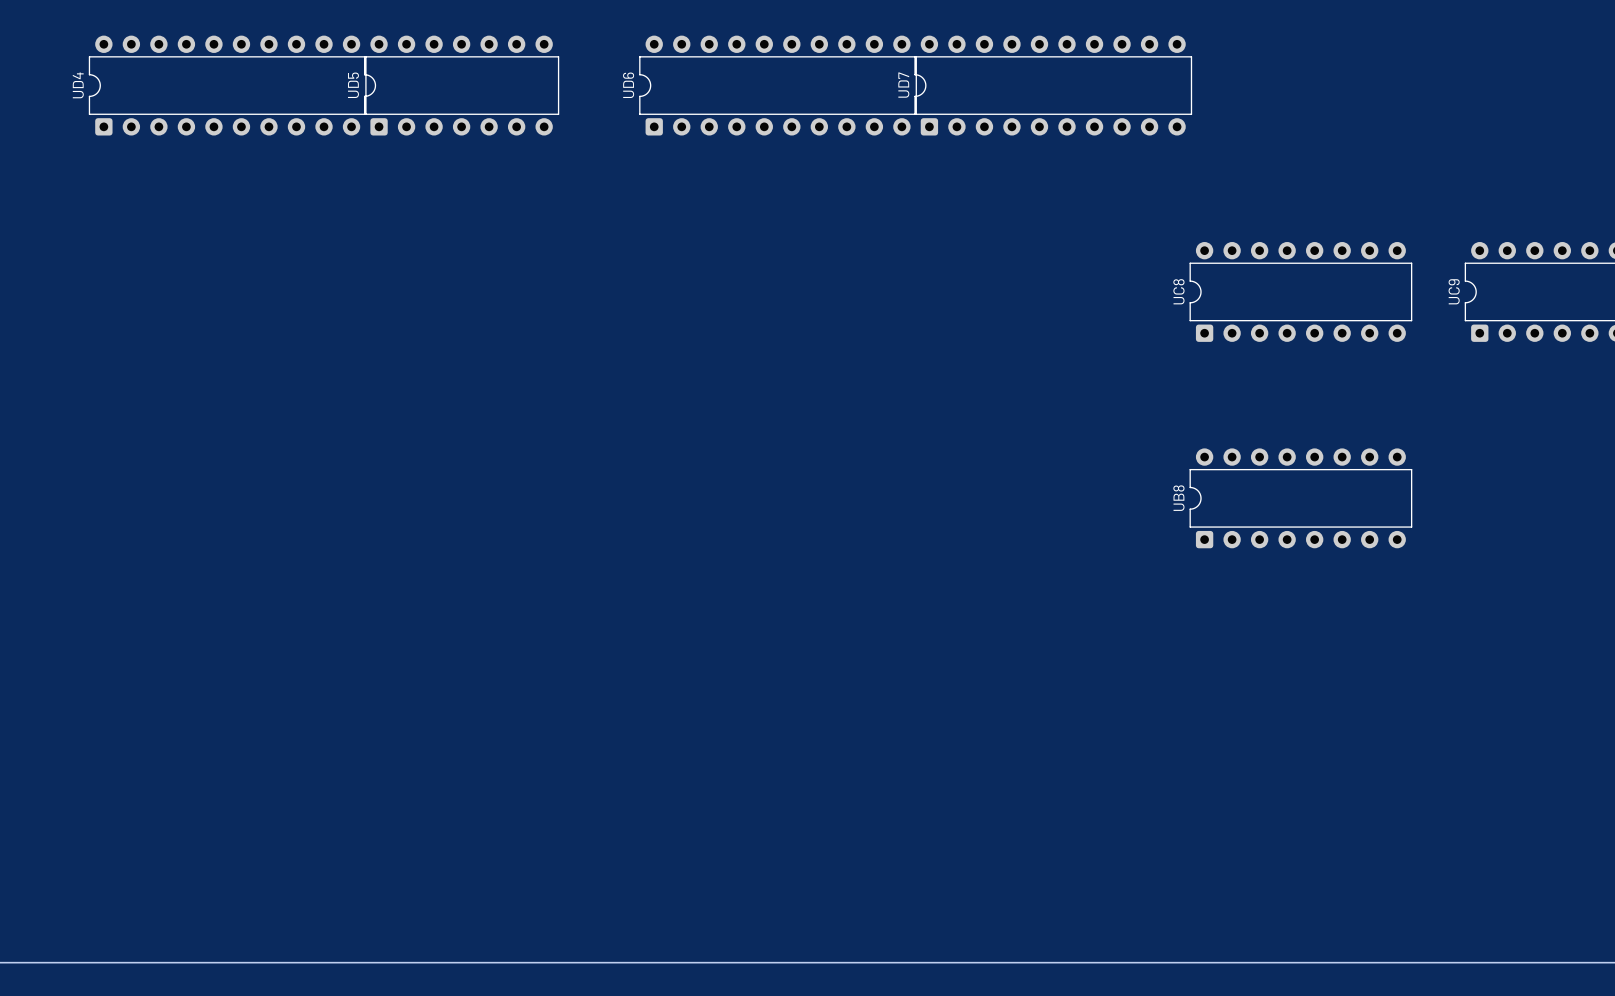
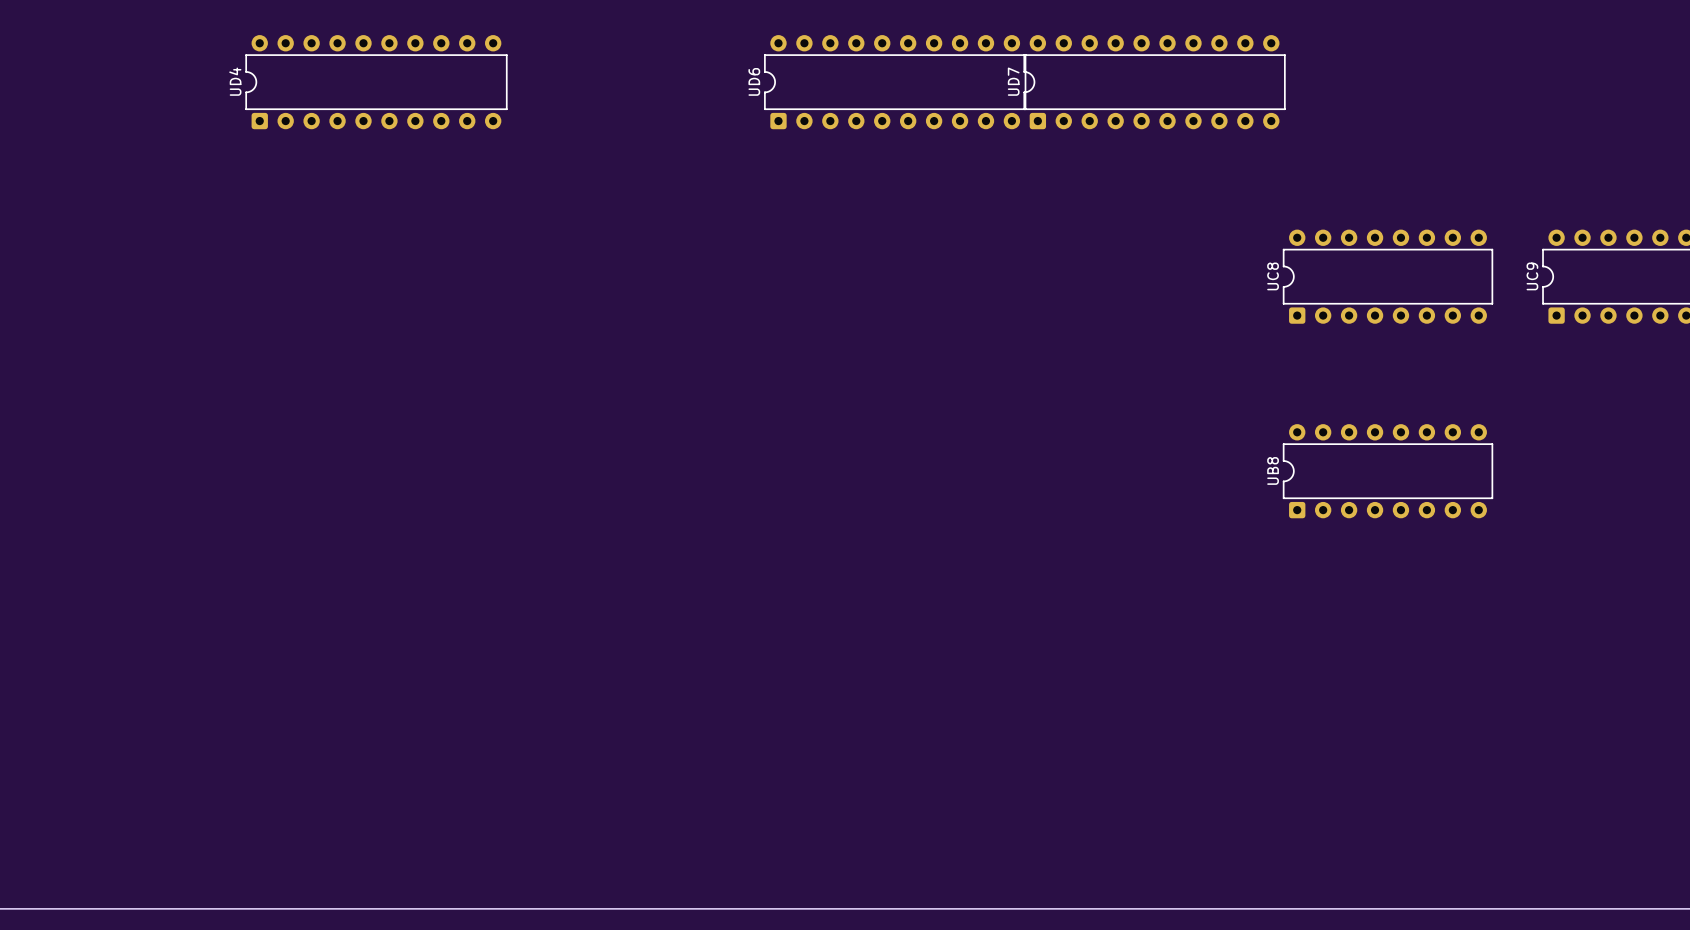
UD5: (461, 85) -> none

